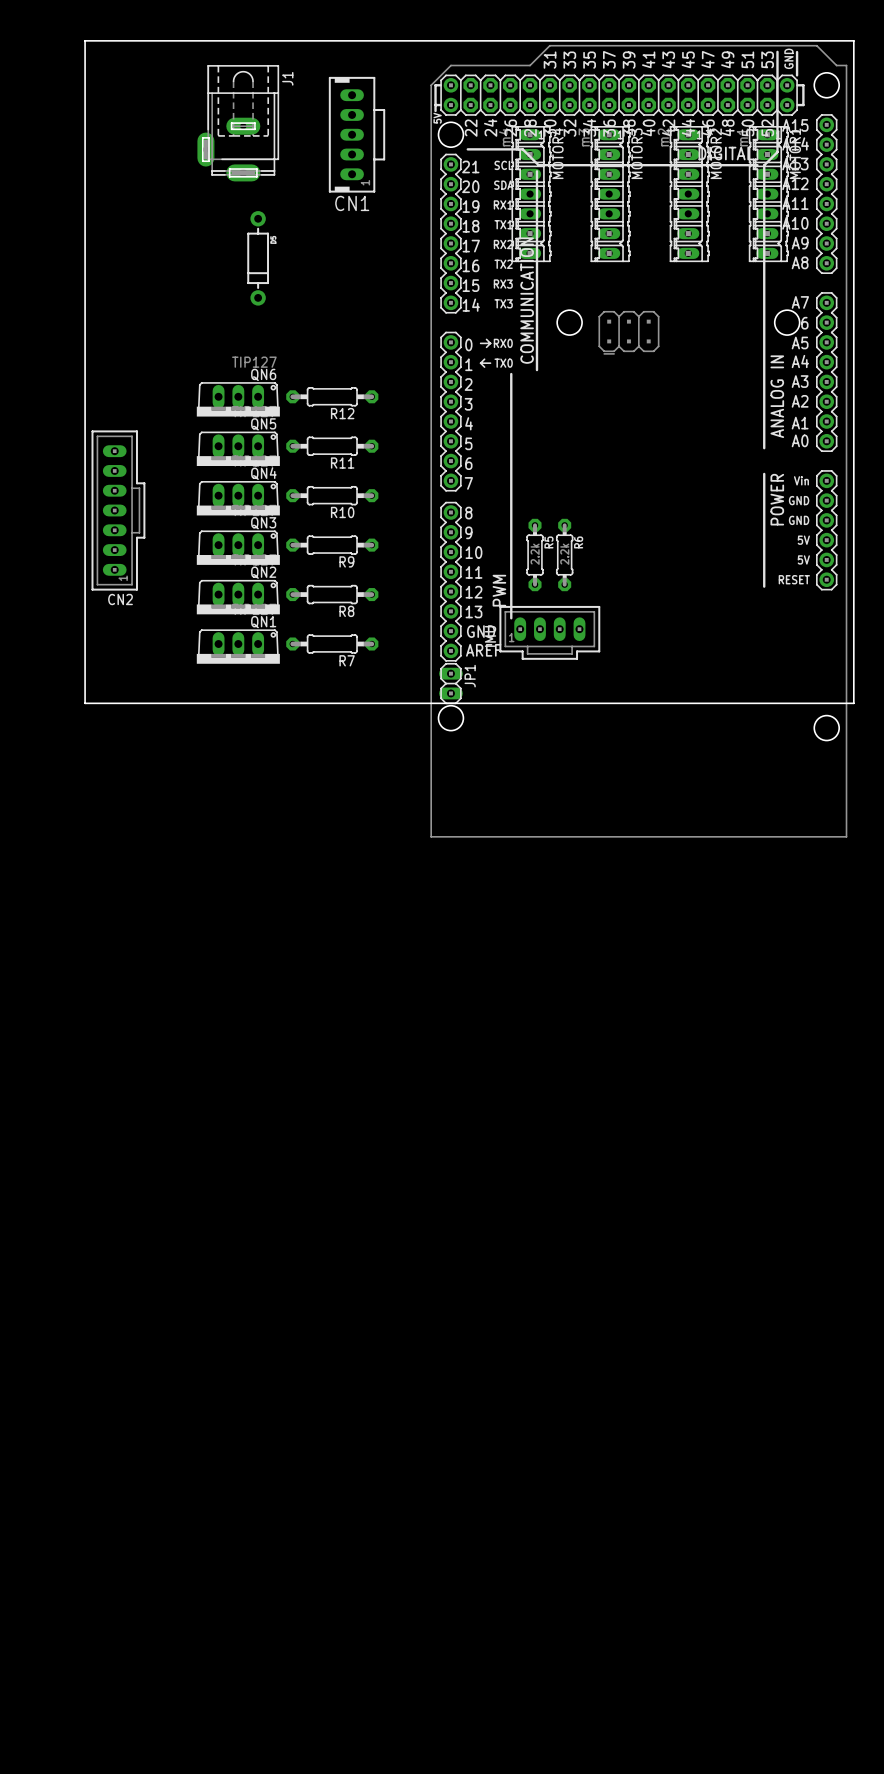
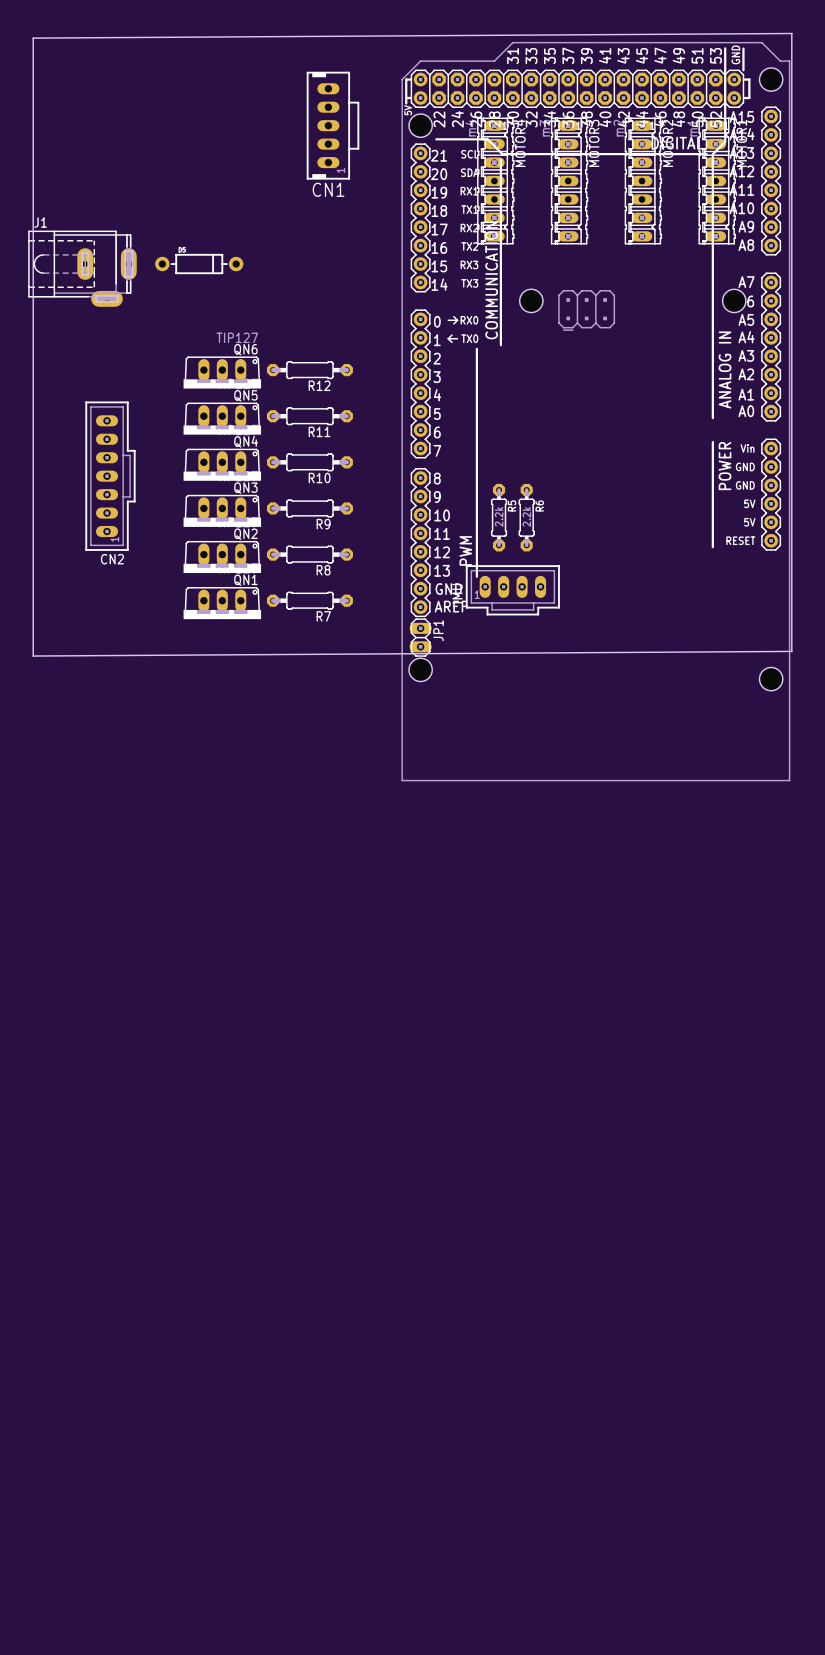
board edge: (85, 40) (853, 40) (853, 703) (85, 703) (85, 40) -> (791, 33) (33, 38) (33, 656) (791, 651) (791, 33)
J1 rotation: 0° (238, 123) -> 90° counterclockwise (82, 268)
J1 position: (238, 123) -> (82, 268)
part rotation: 0° (258, 258) -> 90° counterclockwise (199, 264)

